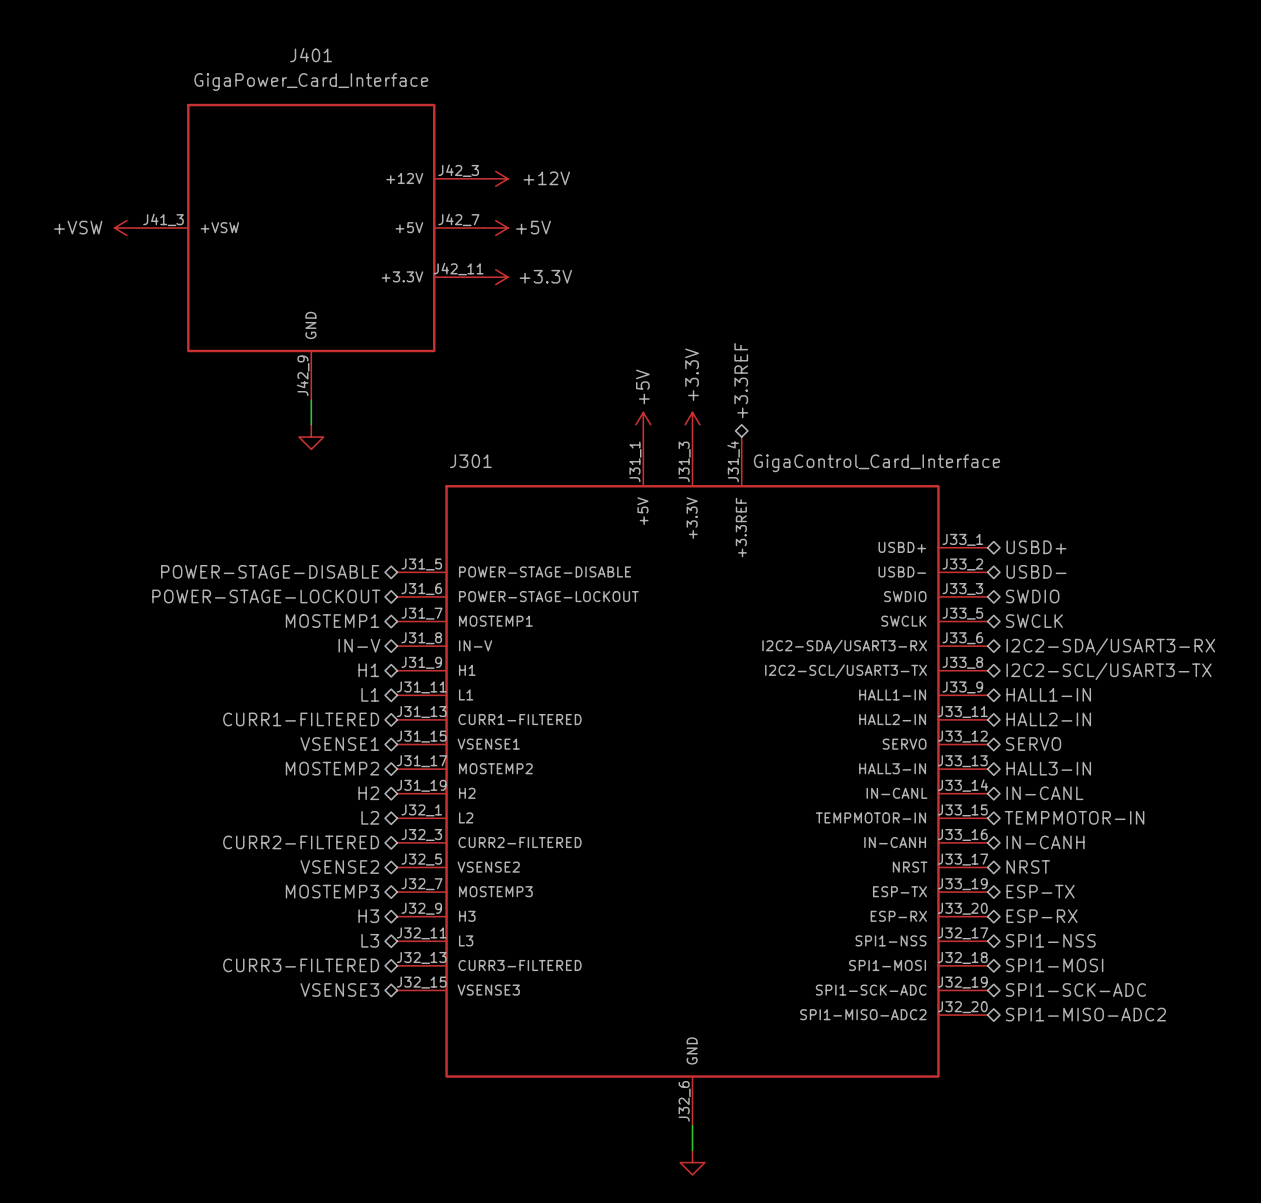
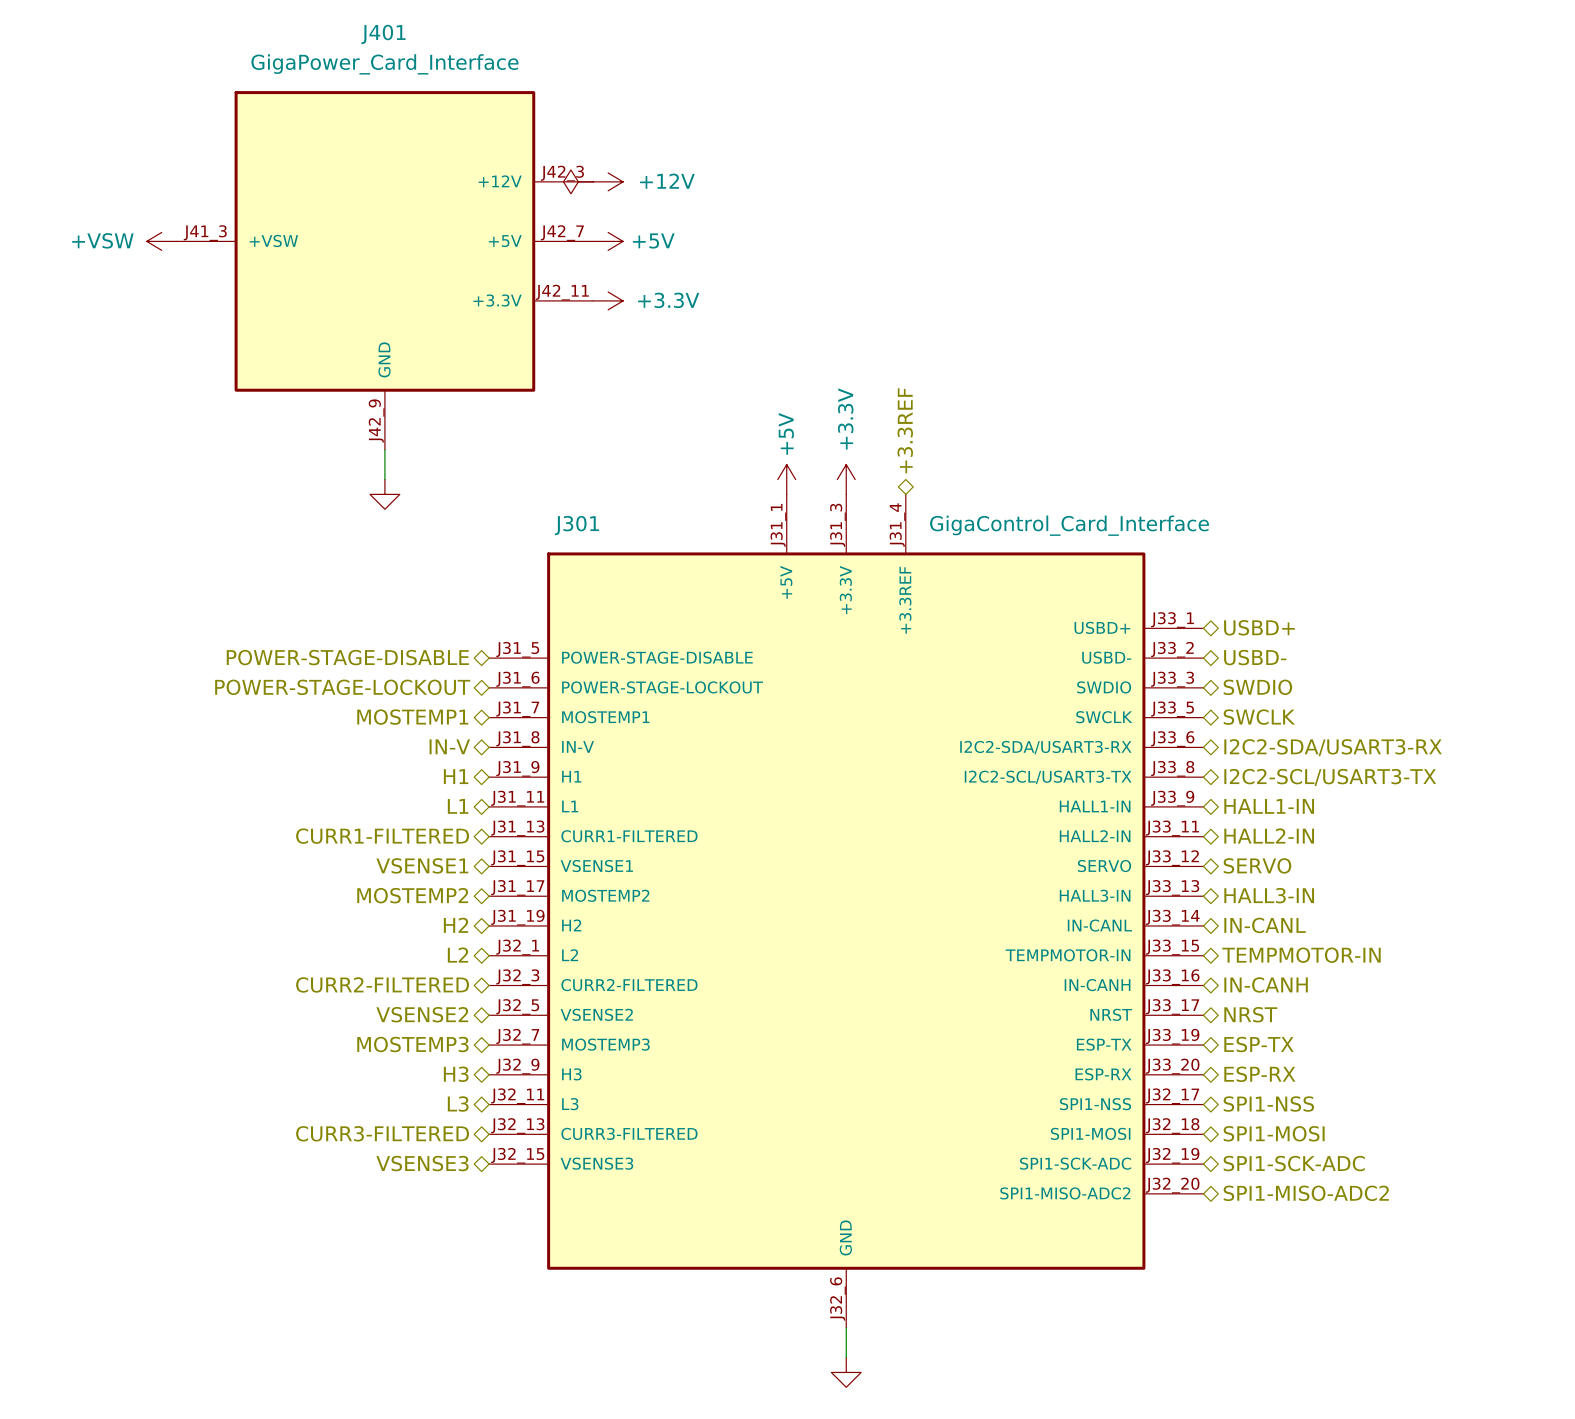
power symbol: none -> (578, 181)

